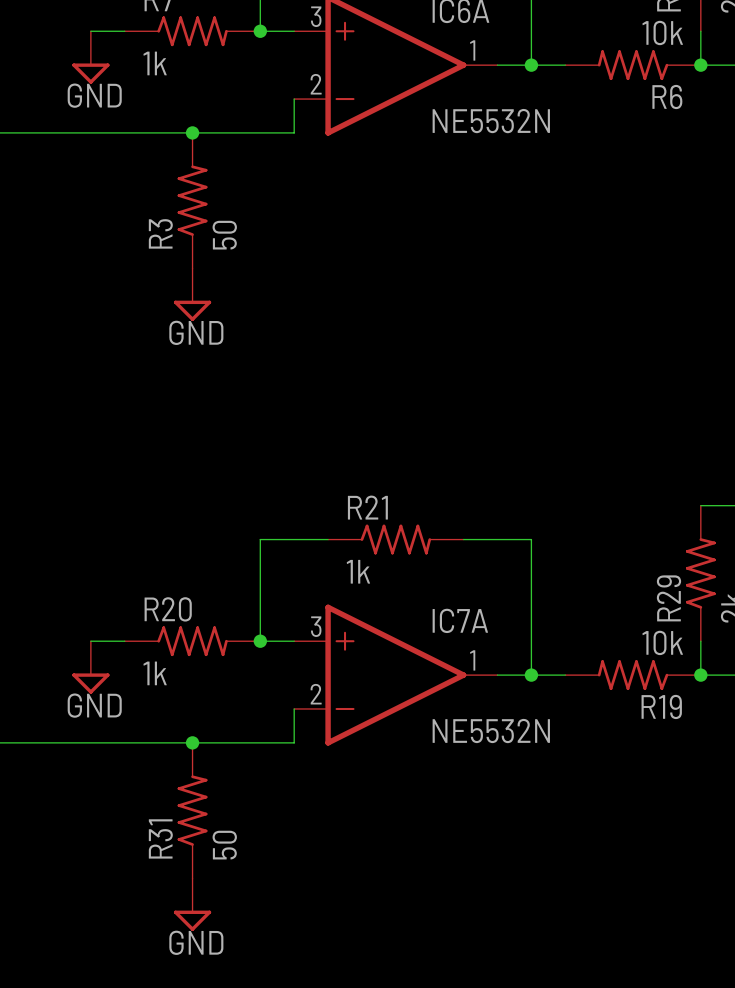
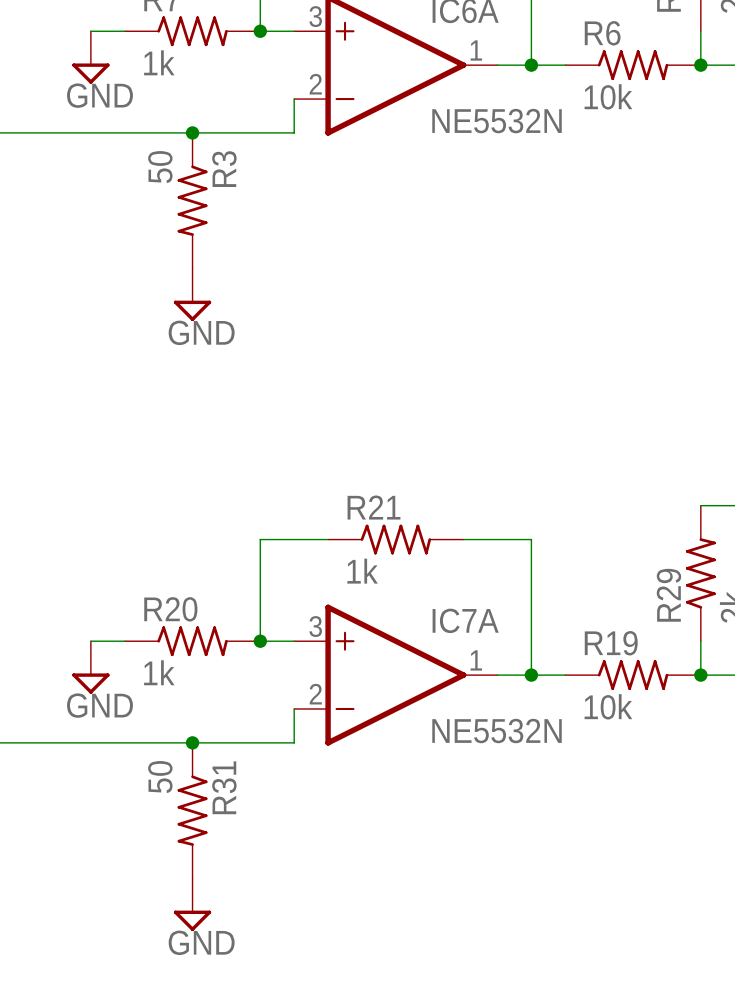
R6 rotation: 0° (633, 65) -> 180° (633, 65)
R3 rotation: 0° (192, 200) -> 180° (192, 200)
R19 rotation: 0° (633, 675) -> 180° (633, 675)
R31 rotation: 0° (192, 810) -> 180° (192, 810)

